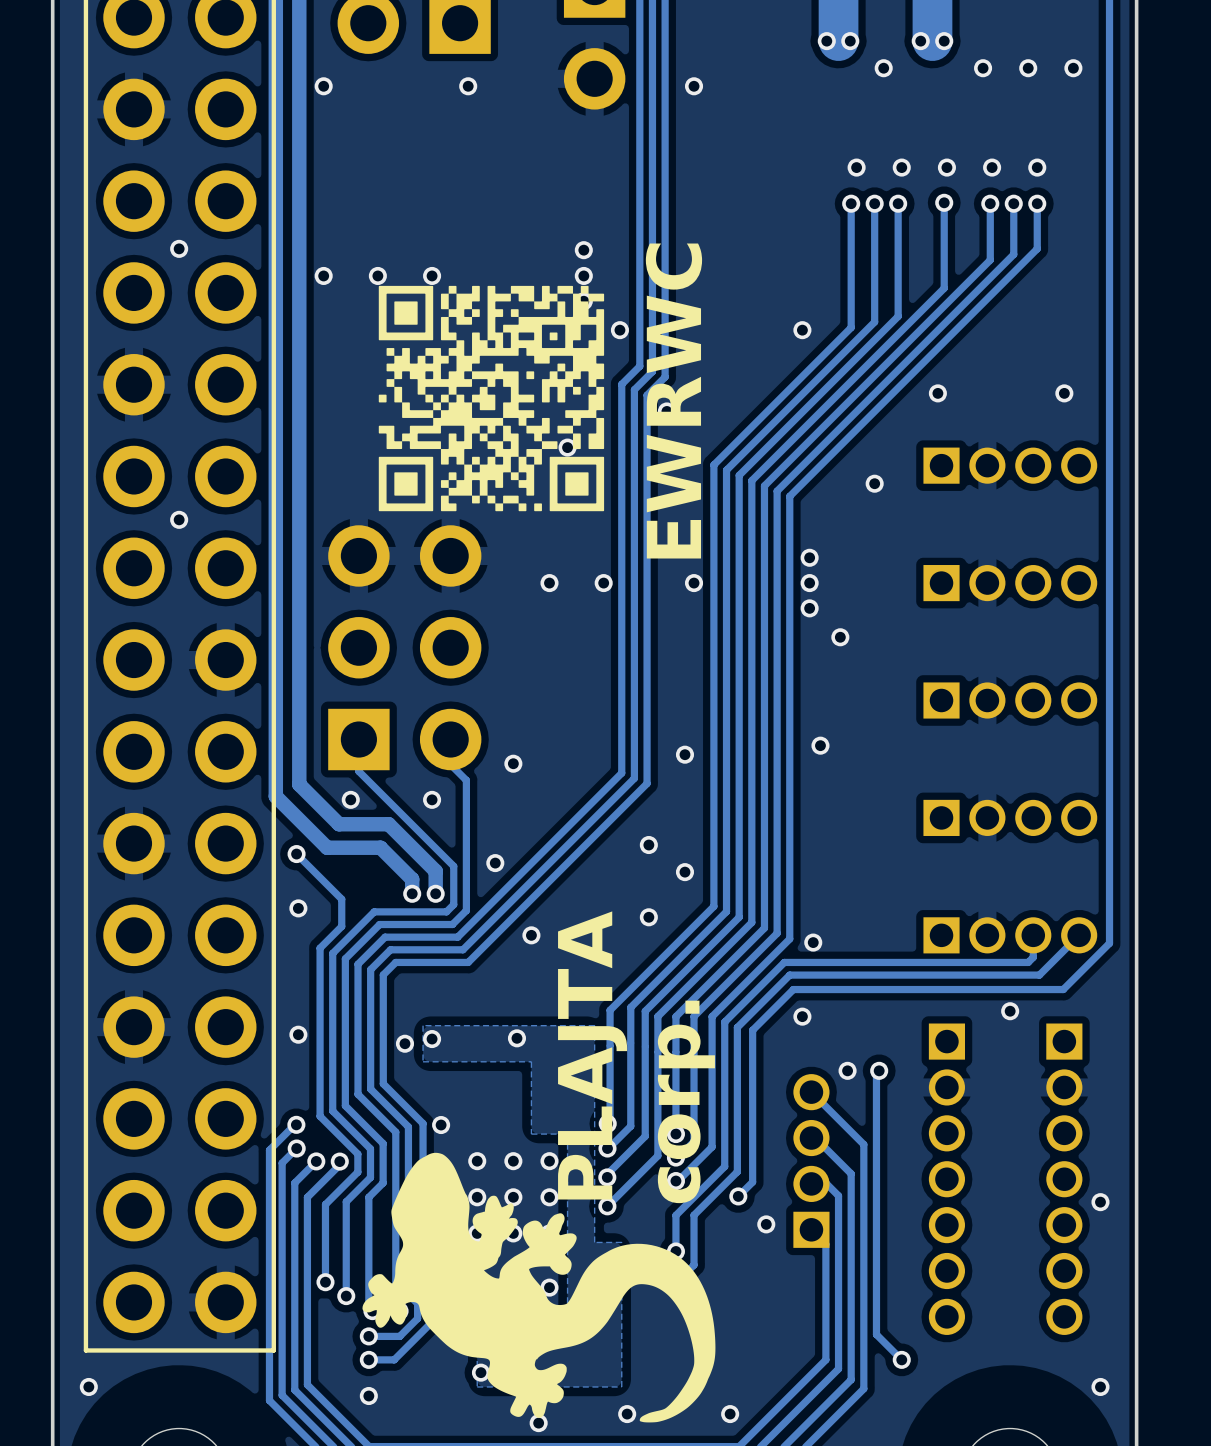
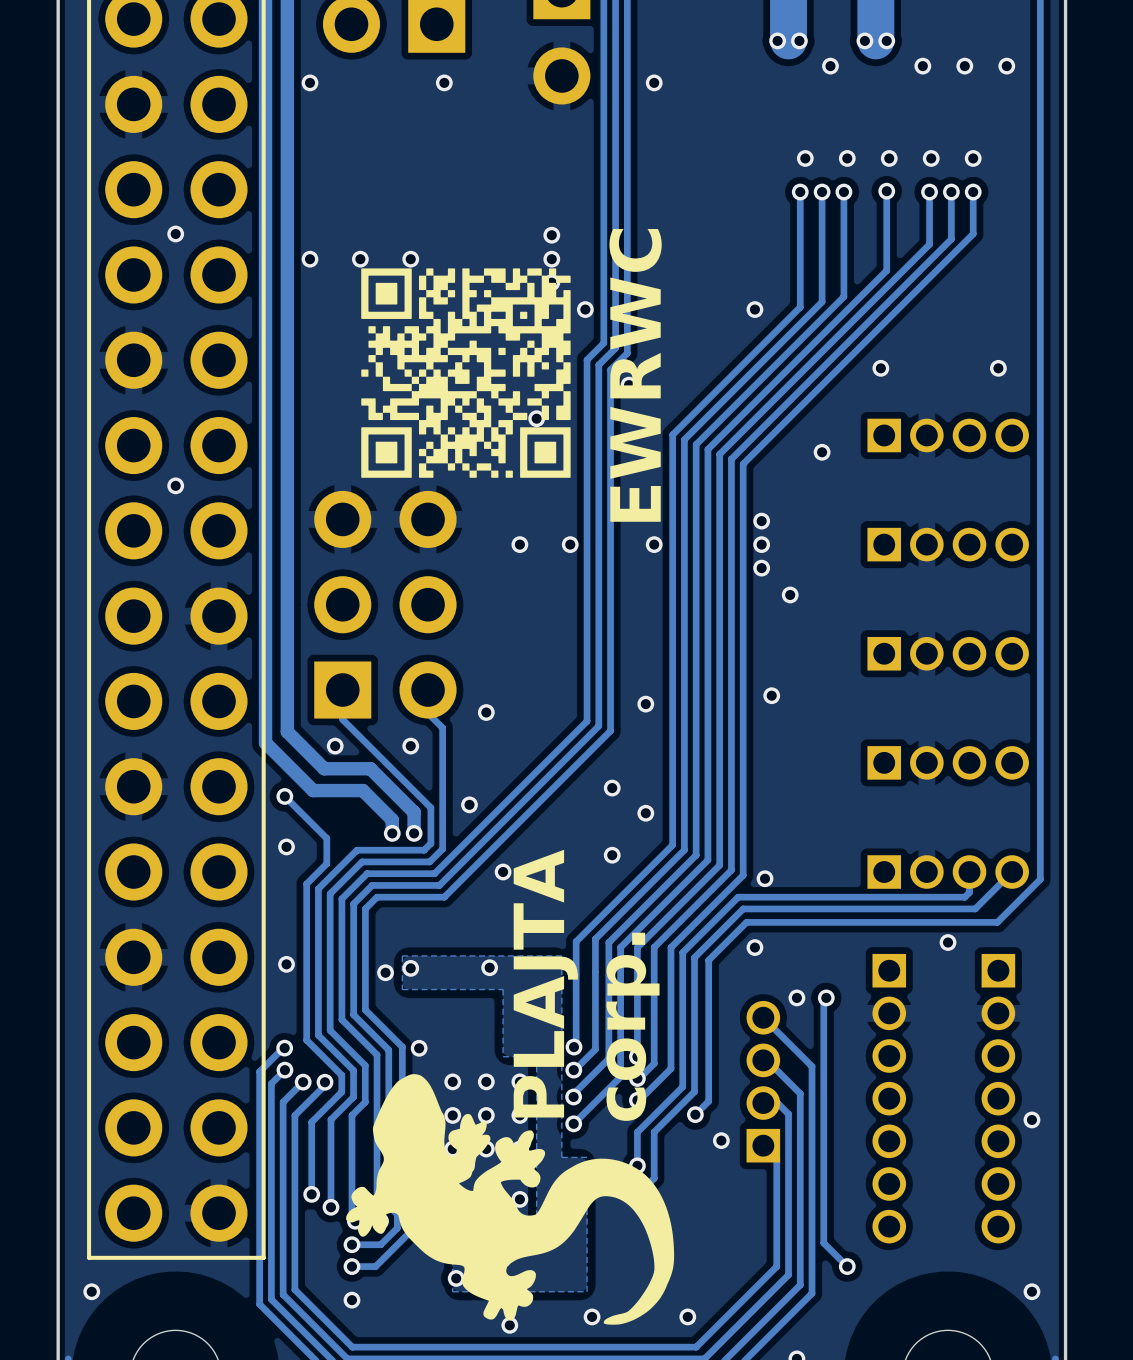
text position: PLAJTA (592, 1055) -> PLAJTA (545, 983)
text position: corp. (686, 1101) -> corp. (633, 1026)

